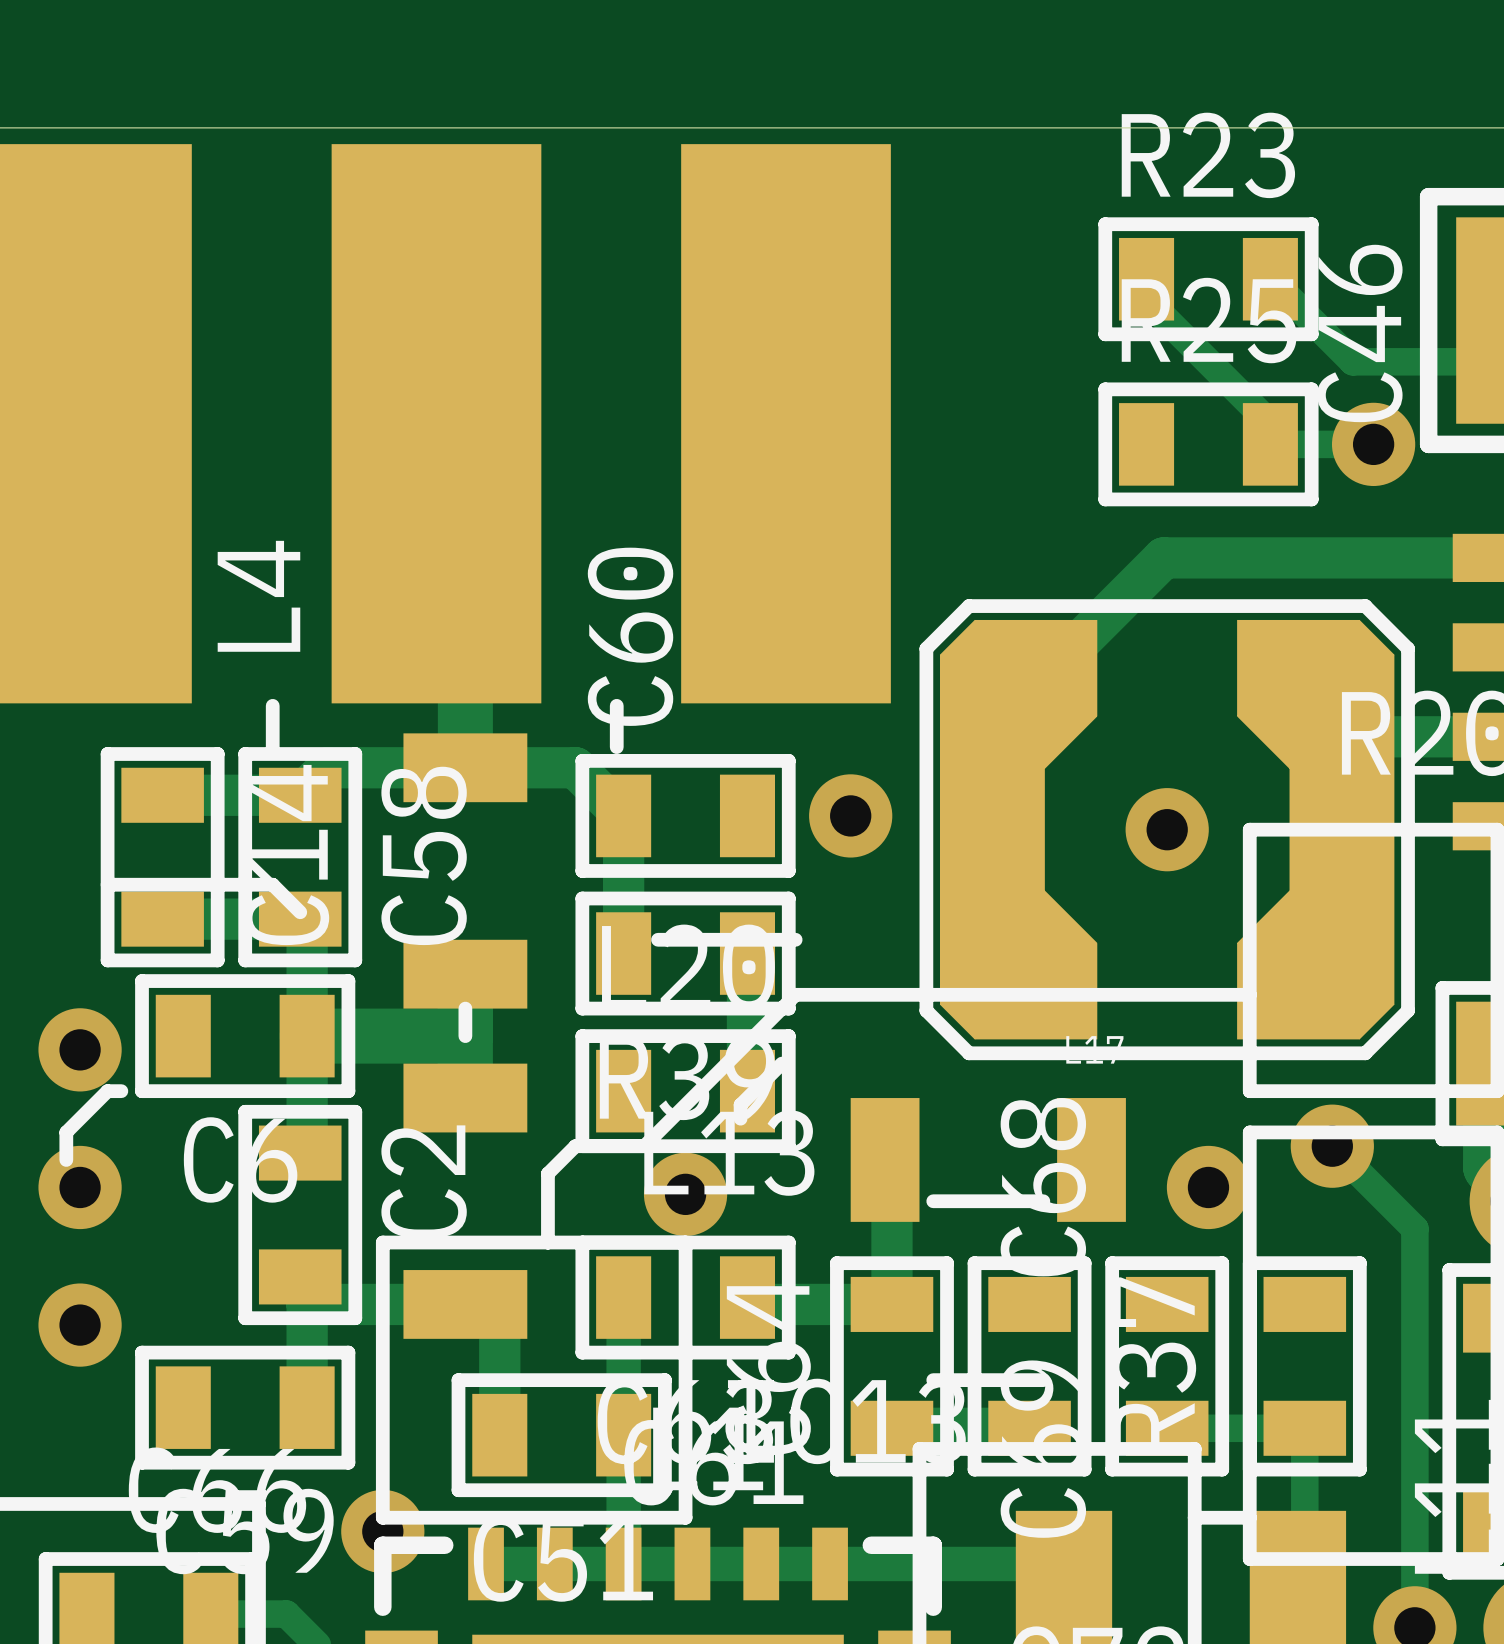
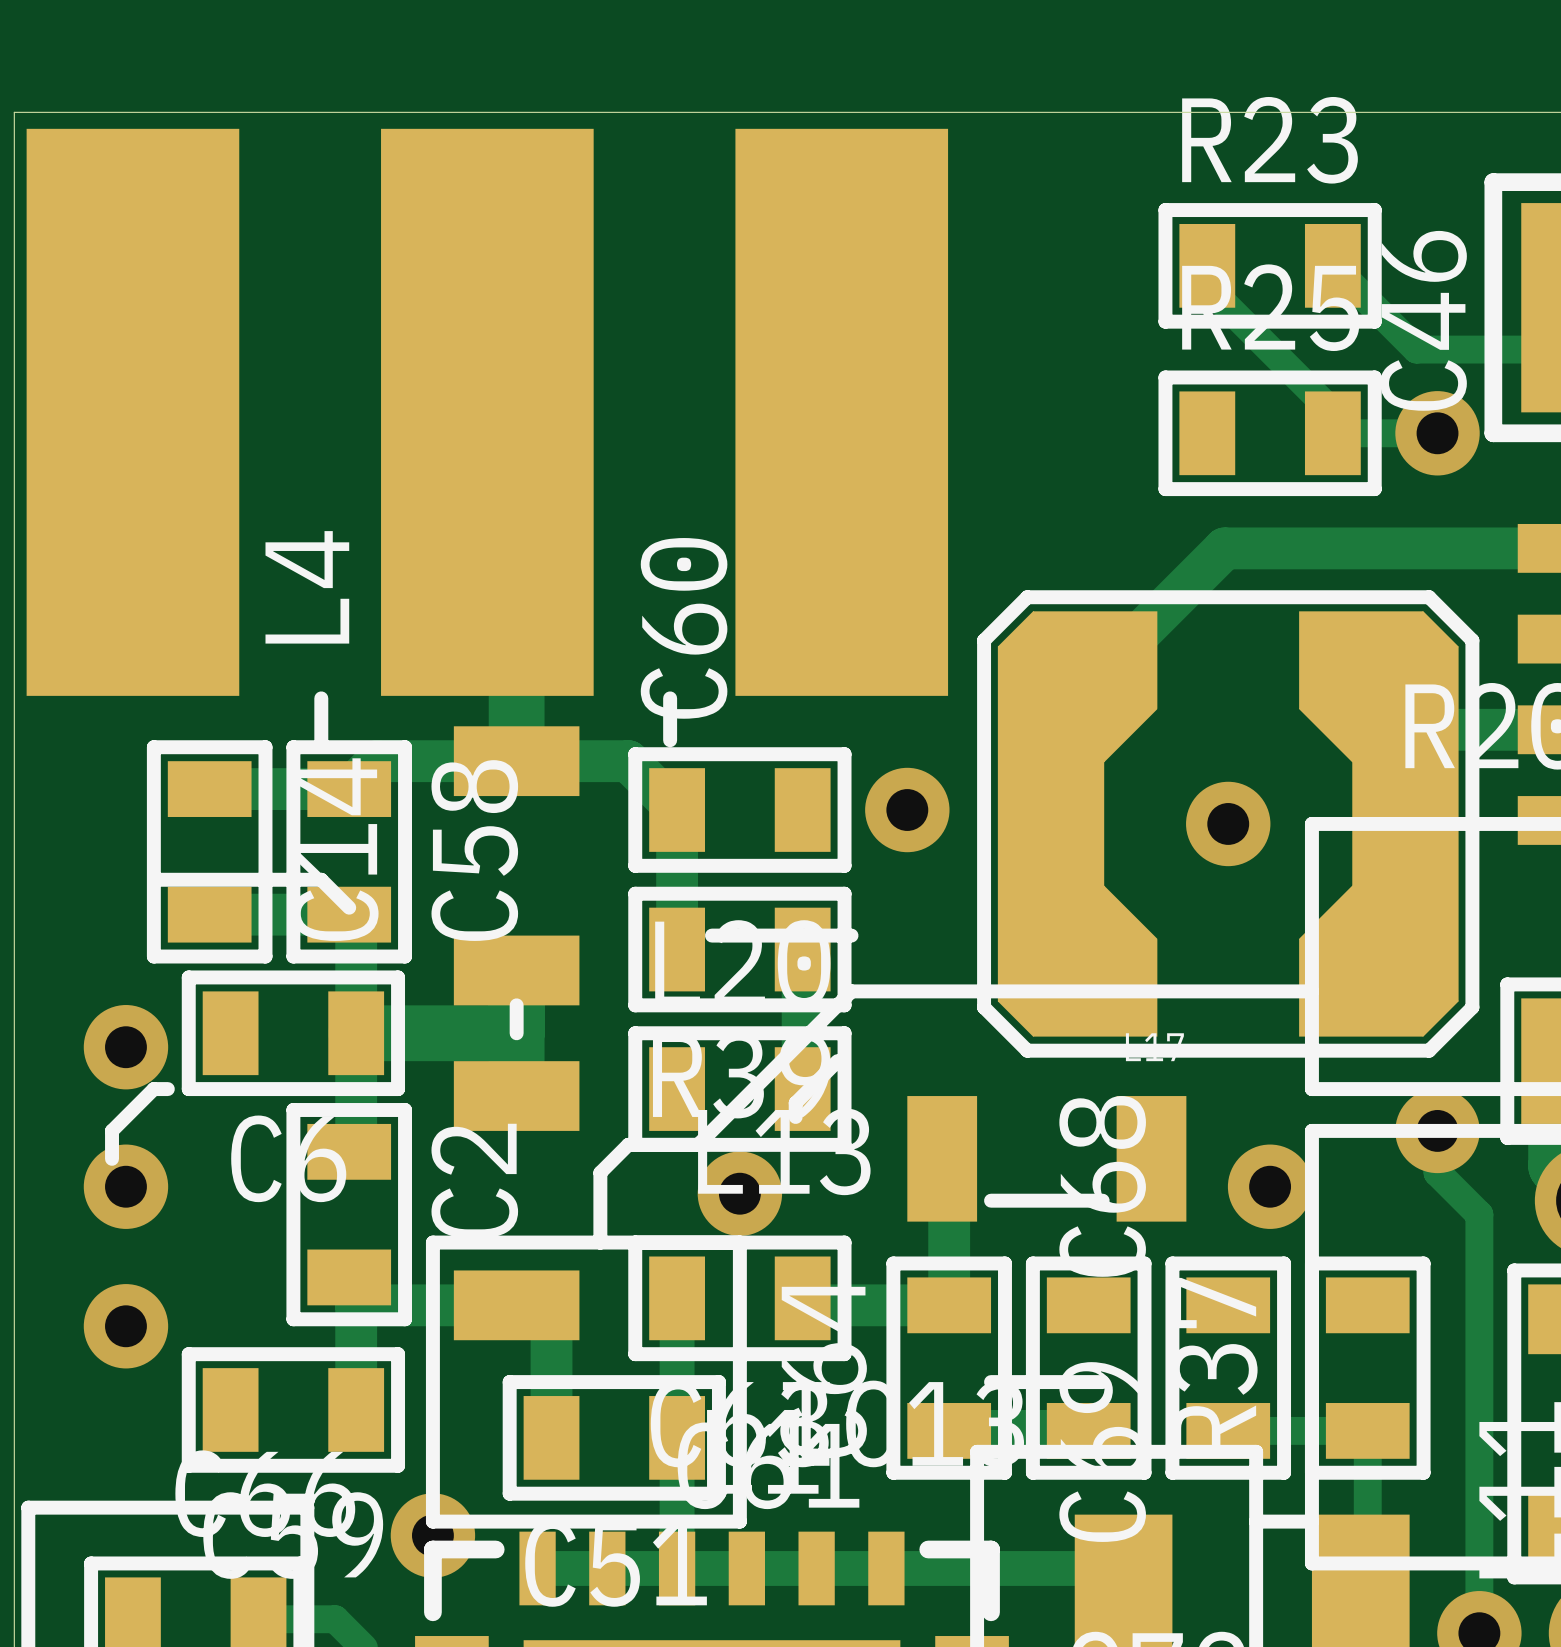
track: (1332, 1146) (1414, 1228) -> (1437, 1130) (1437, 1172) (1479, 1214) (1479, 1228)
via position: (1332, 1146) -> (1437, 1130)

